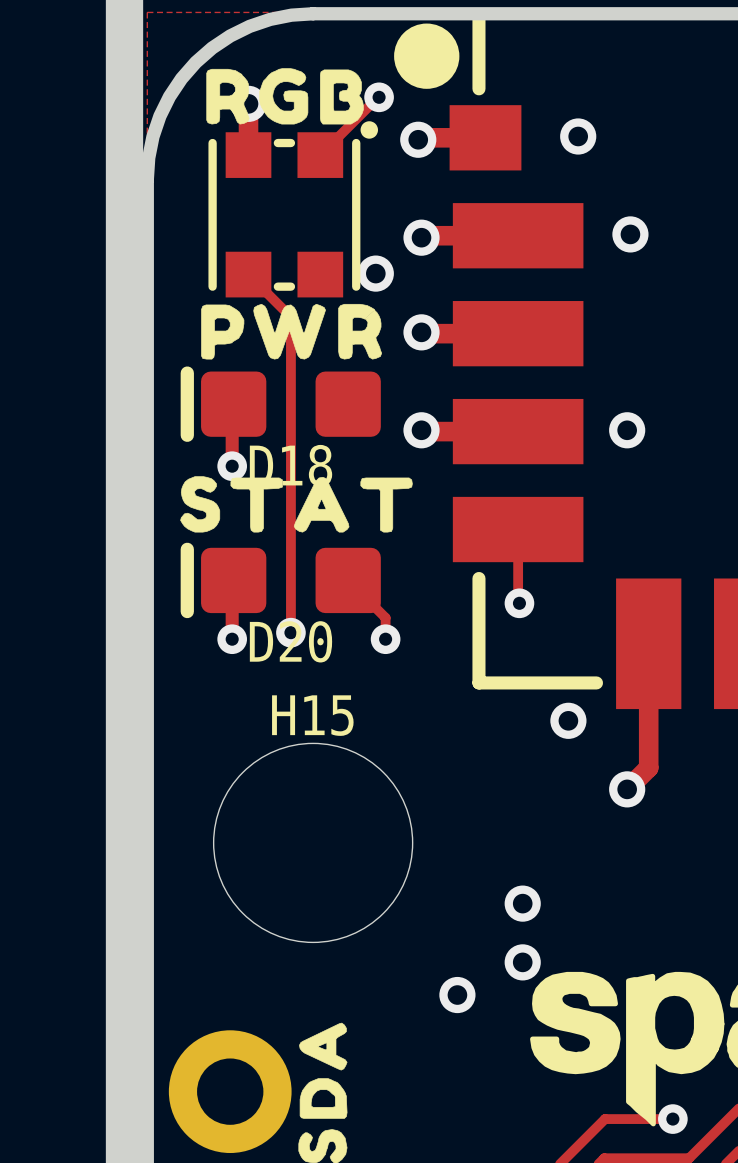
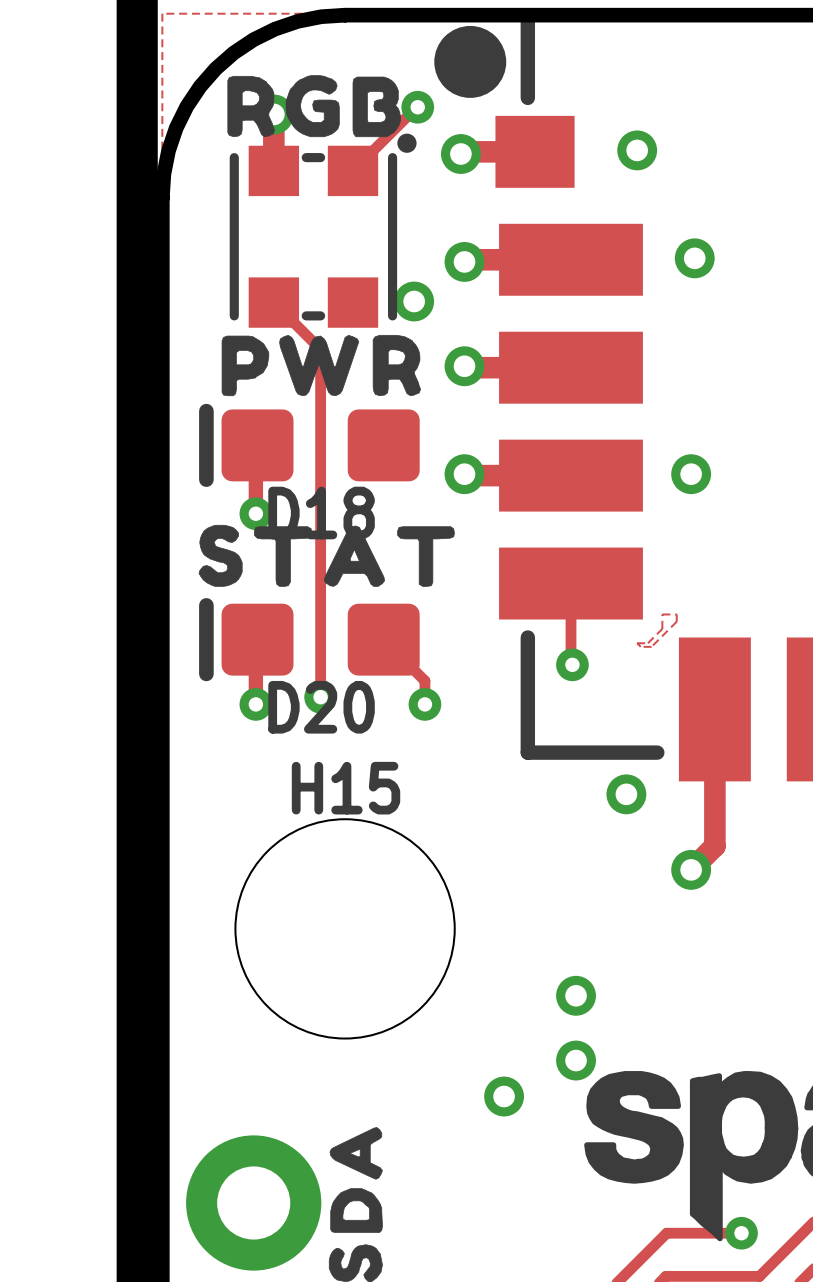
zone outline: none -> (662, 614) (662, 628) (647, 643) (637, 643) (640, 646) (651, 646) (676, 621) (676, 614) (662, 614)

